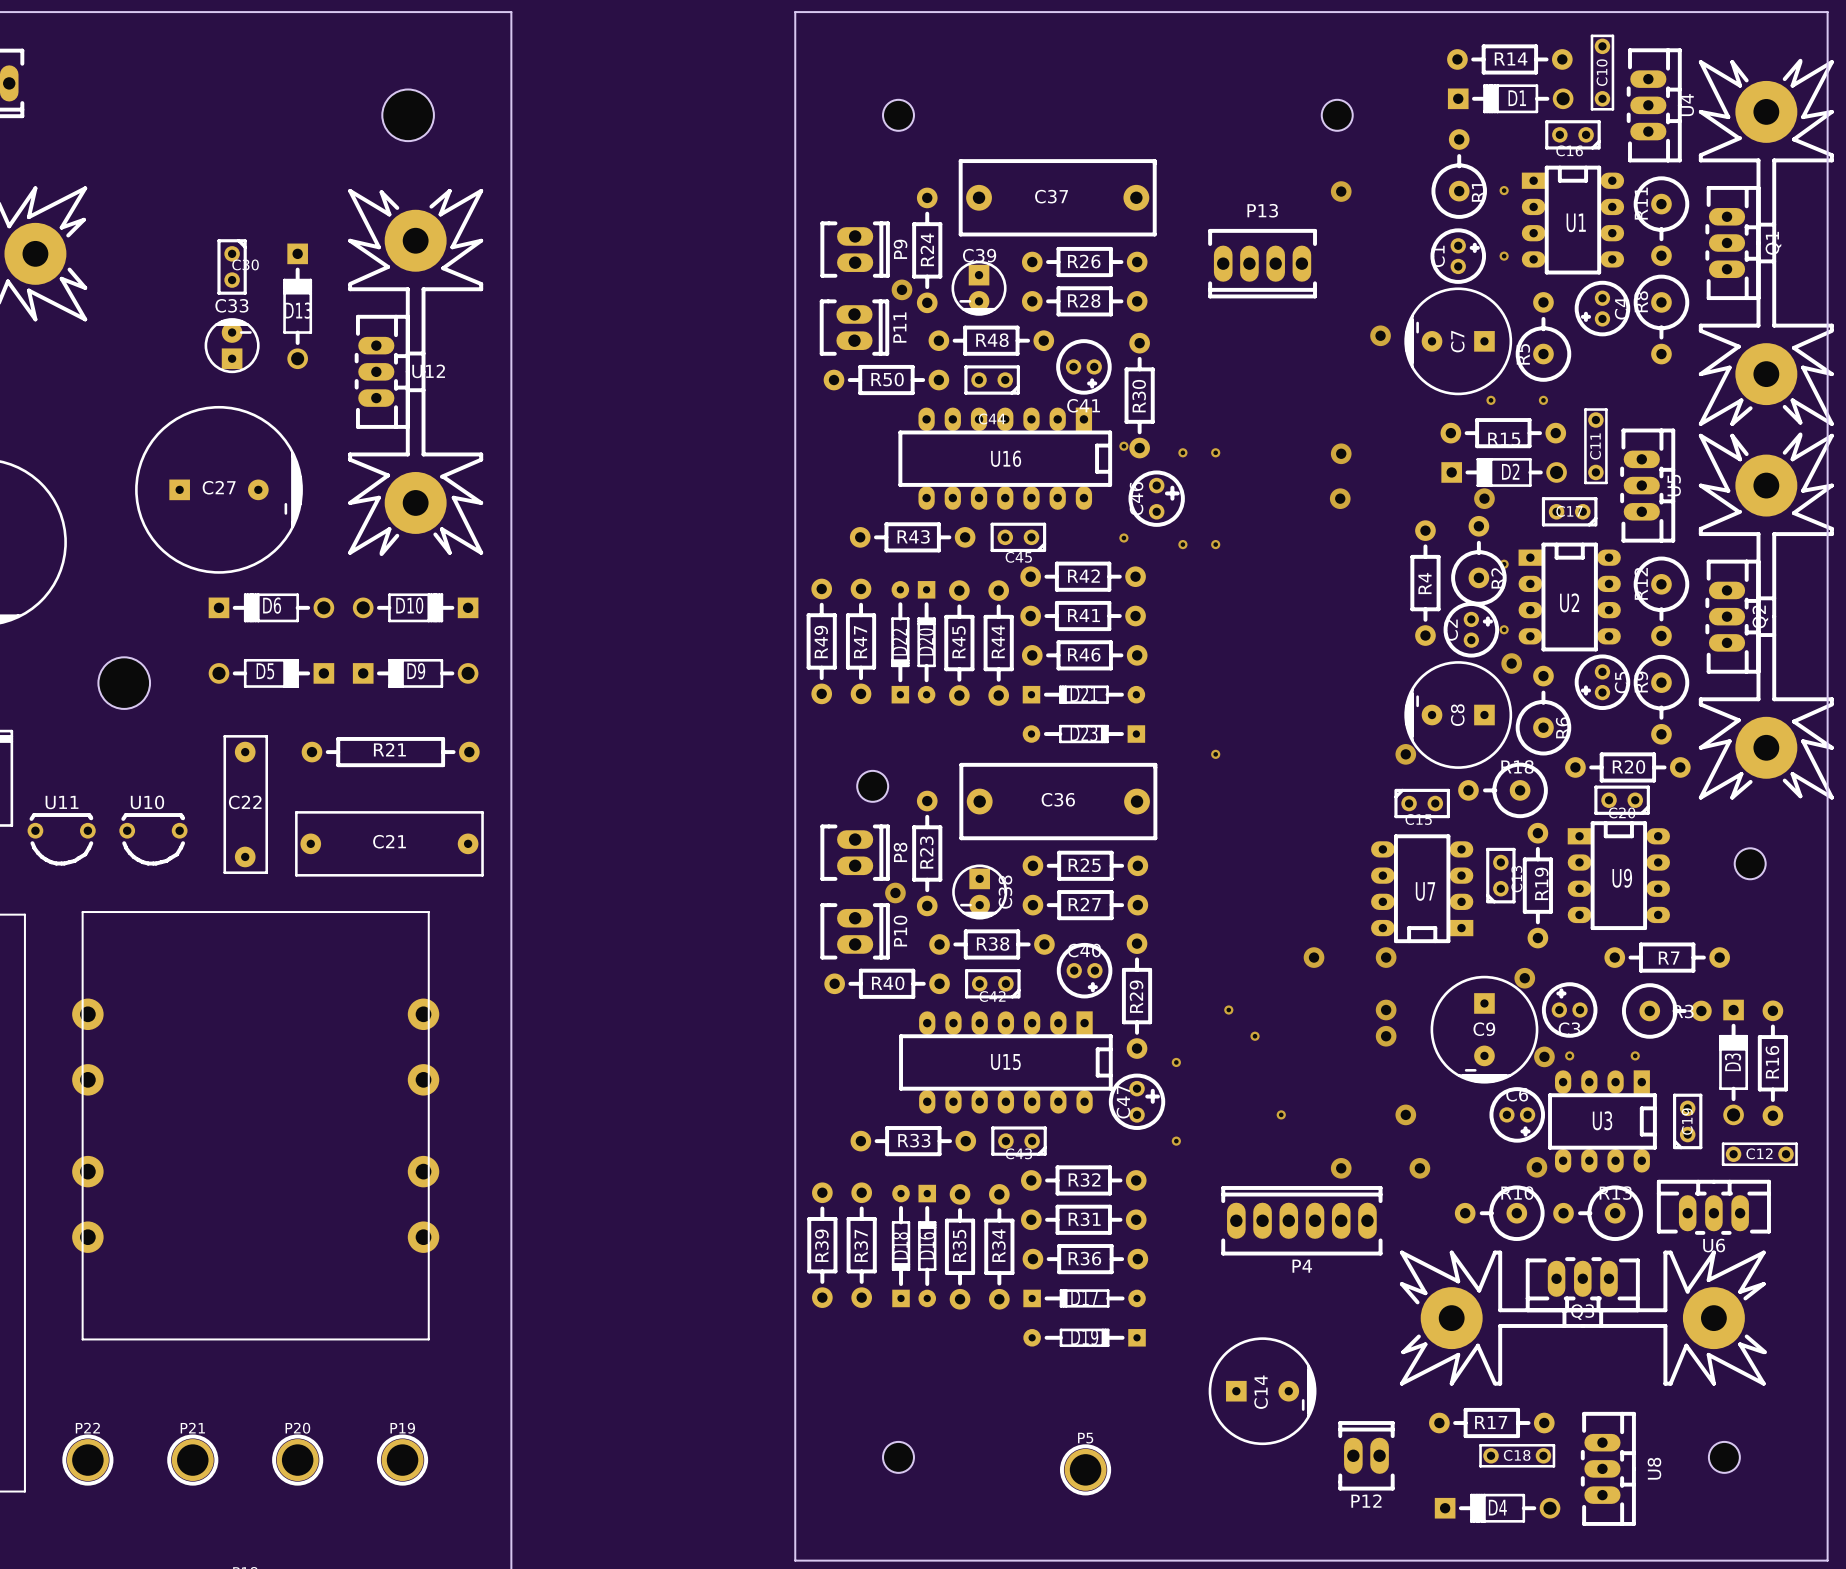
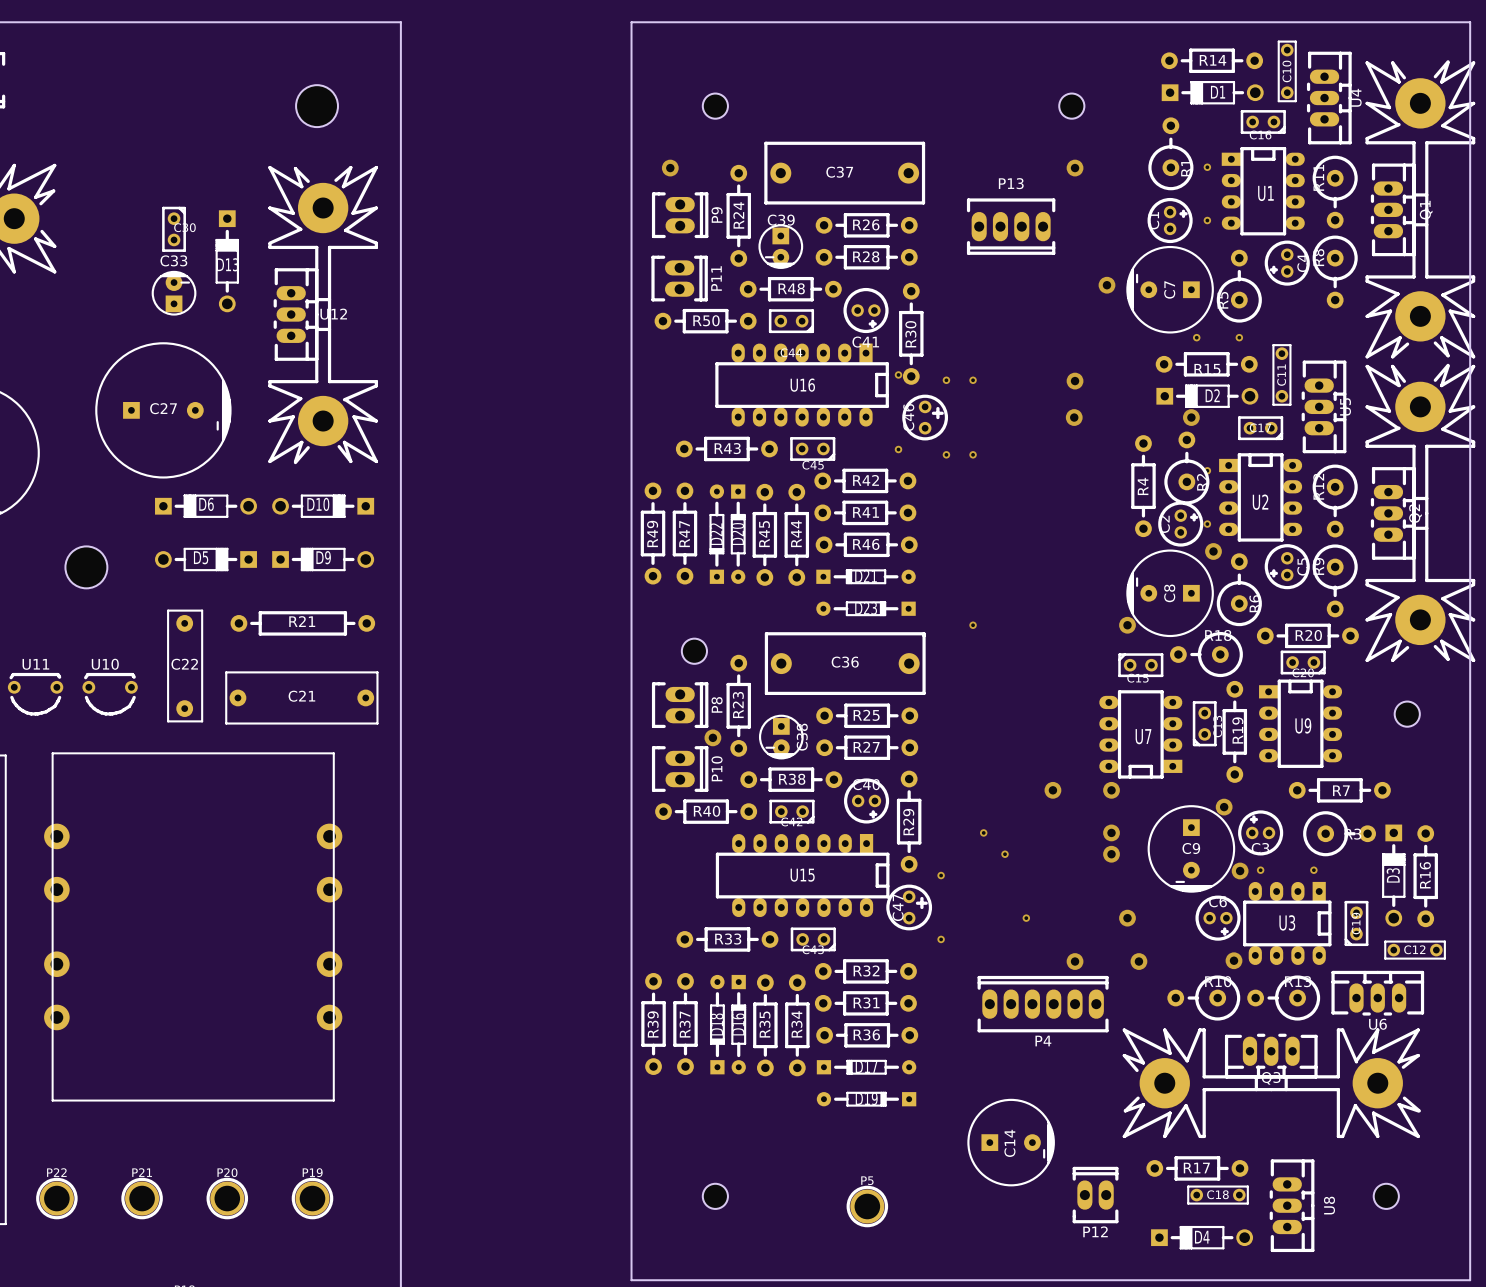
via: none -> (670, 168)
via: (902, 289) -> none

